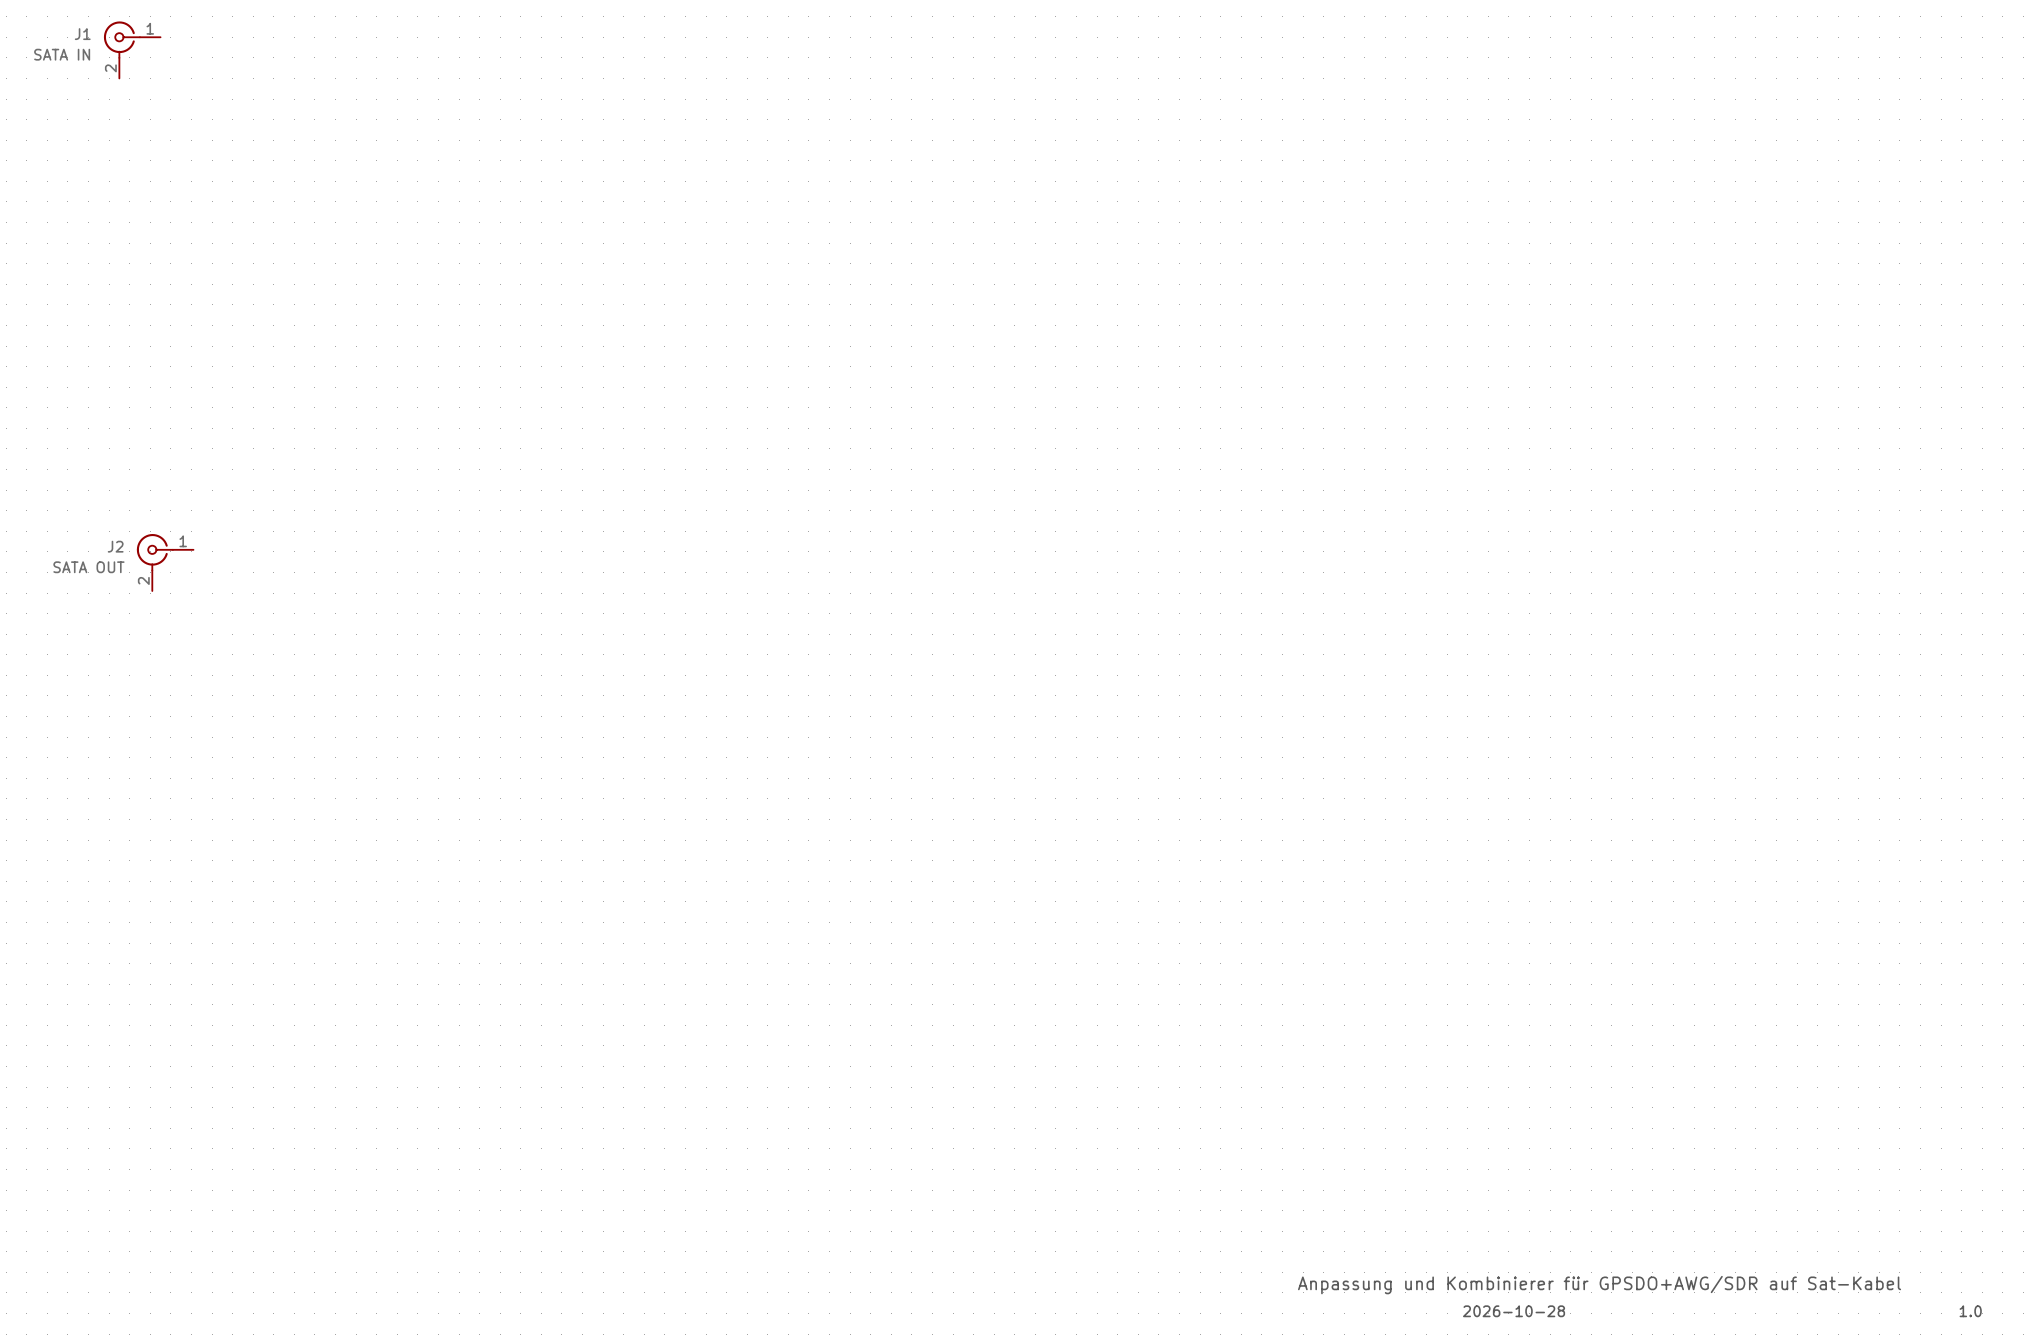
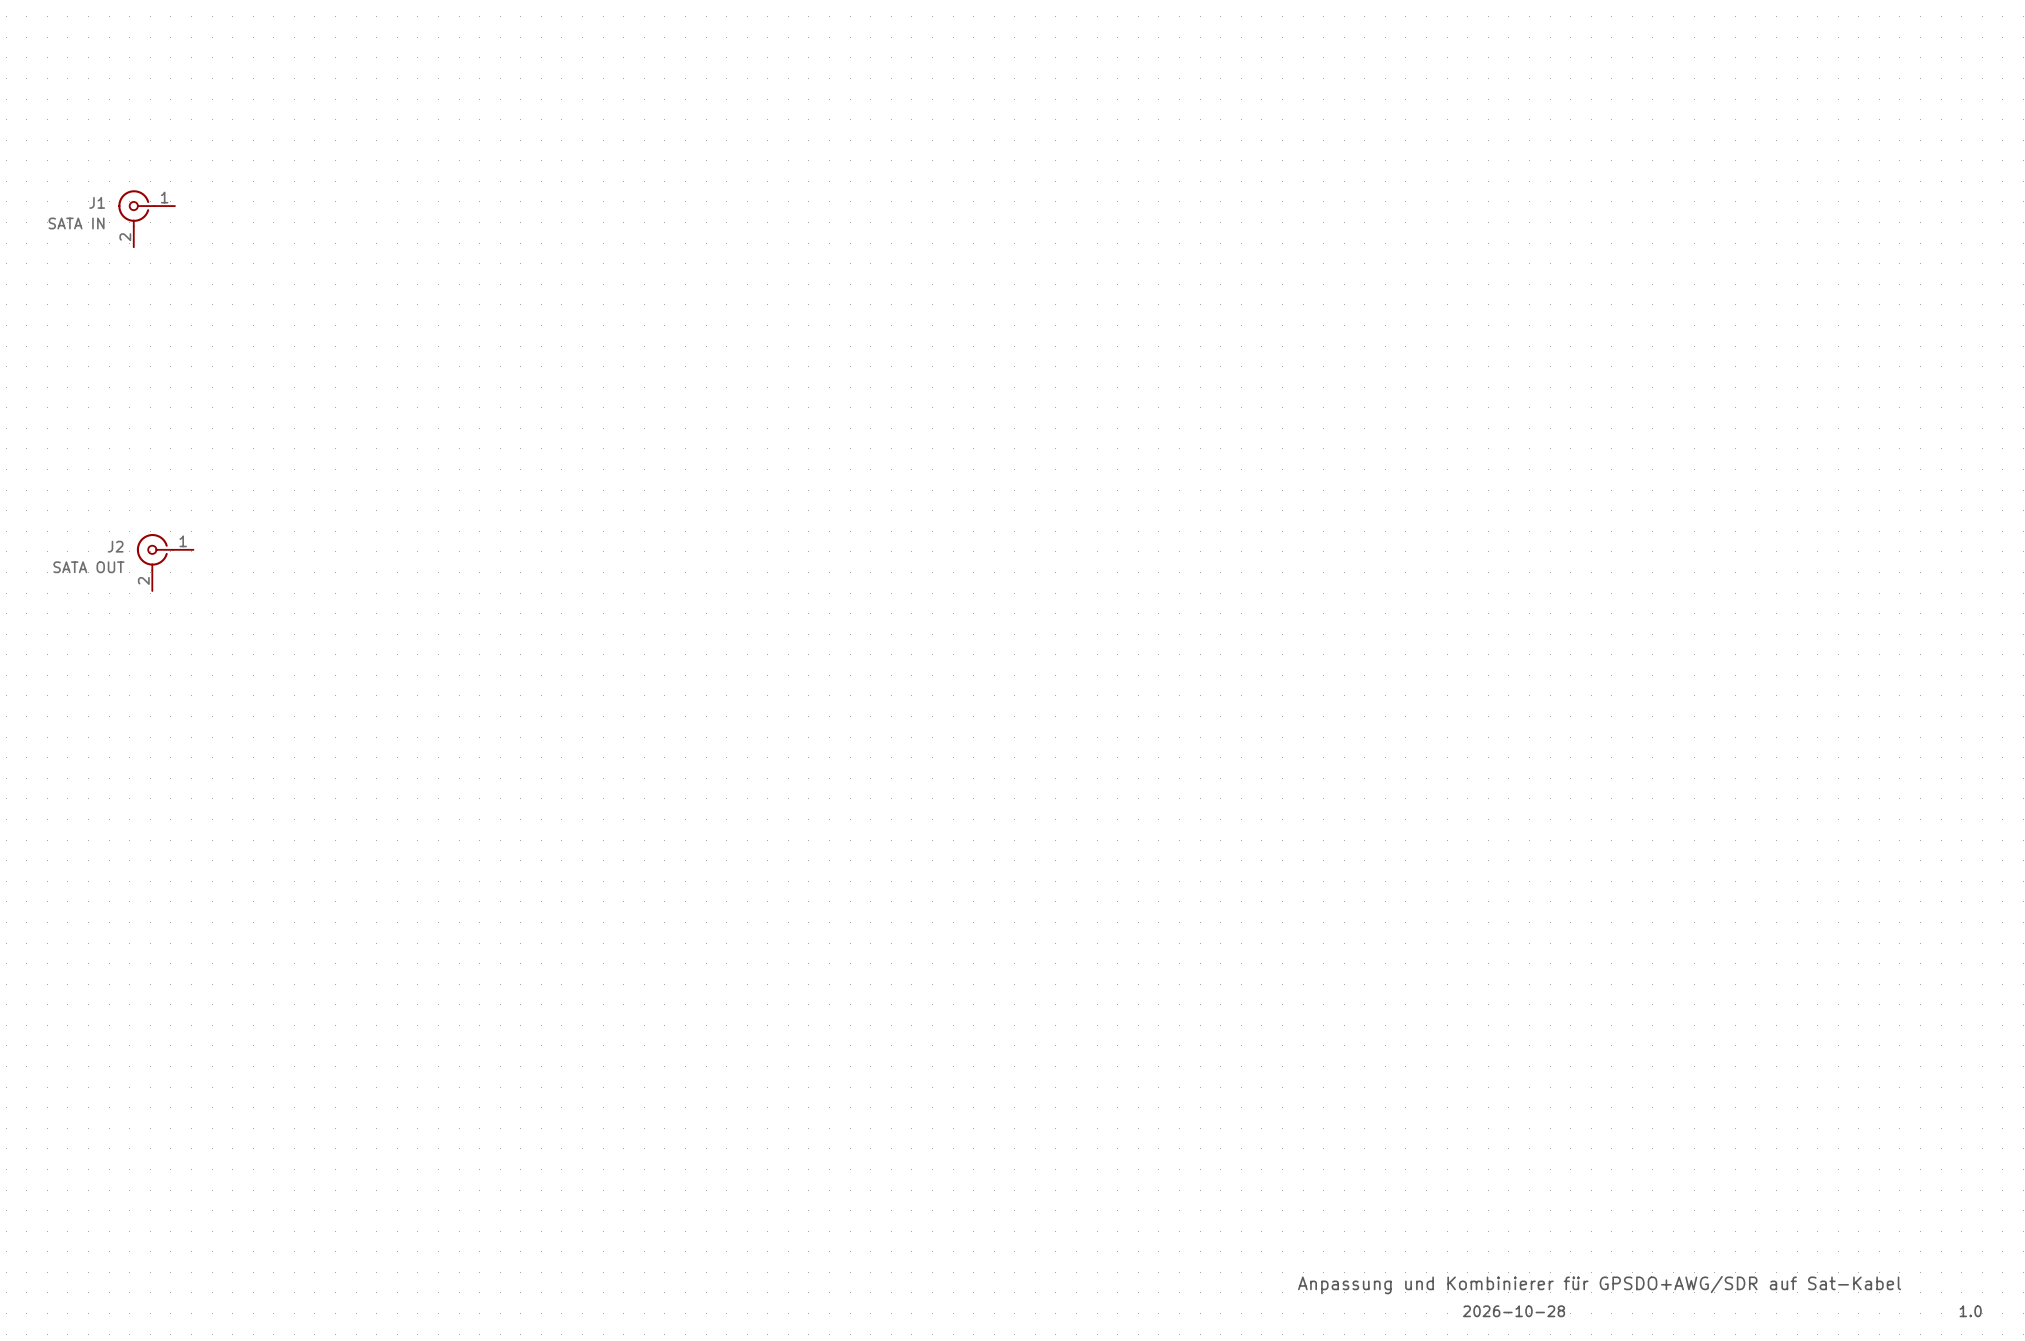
J1 position: (132, 49) -> (146, 218)

